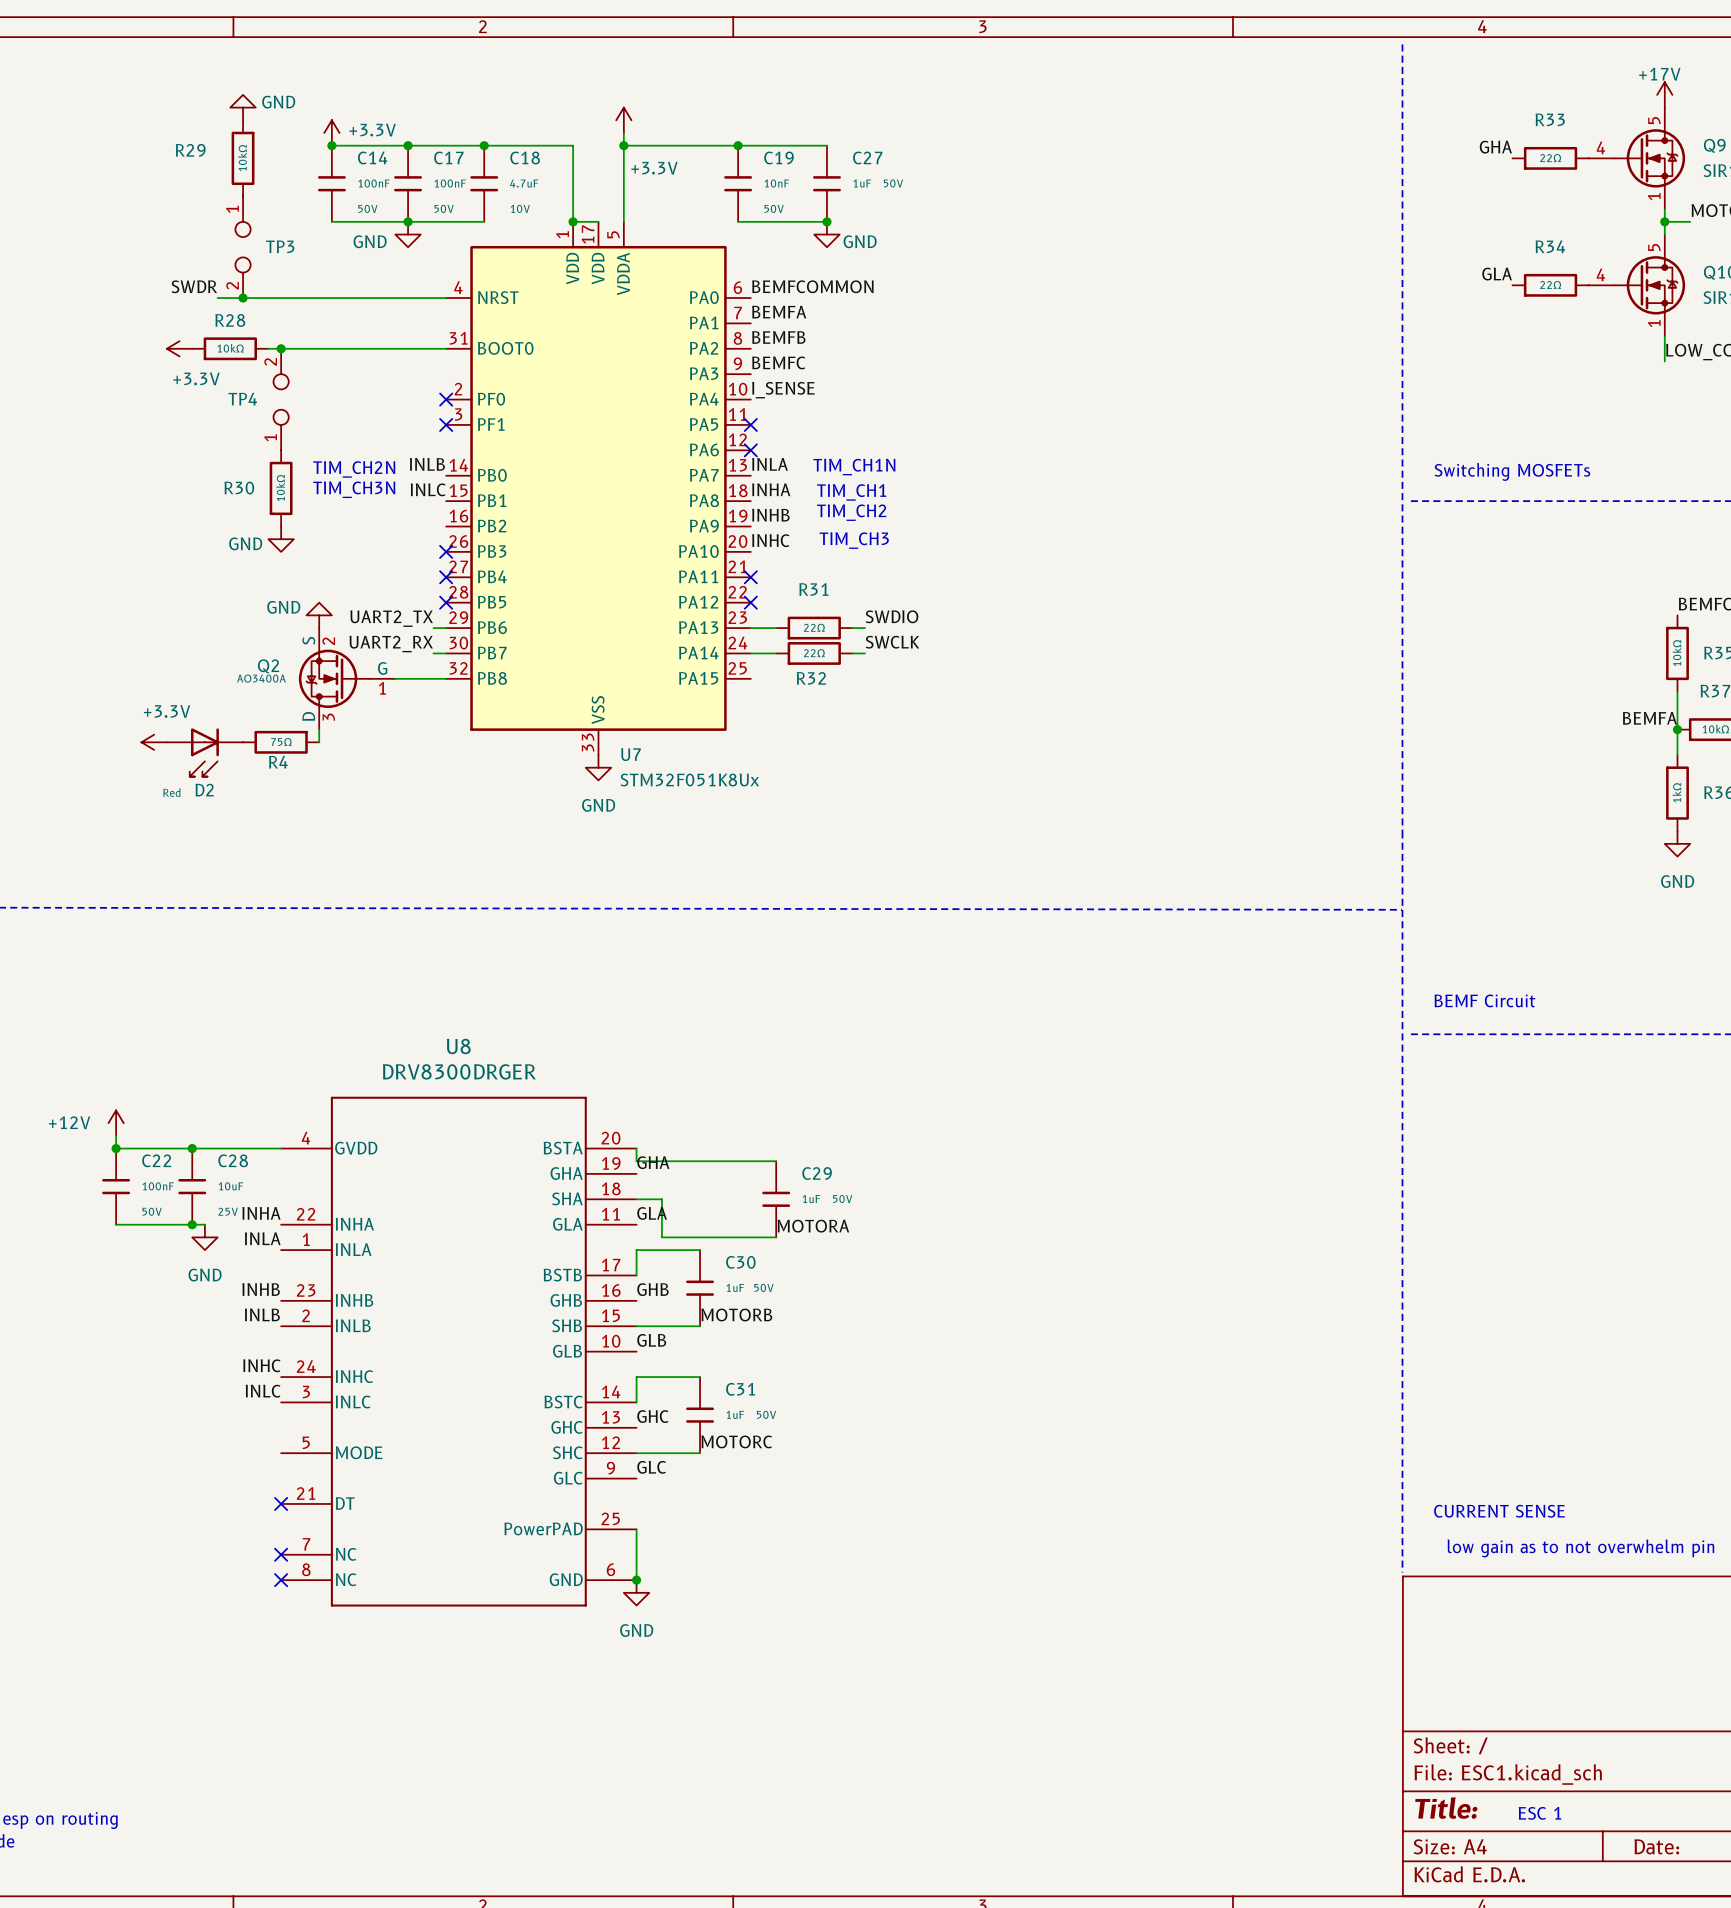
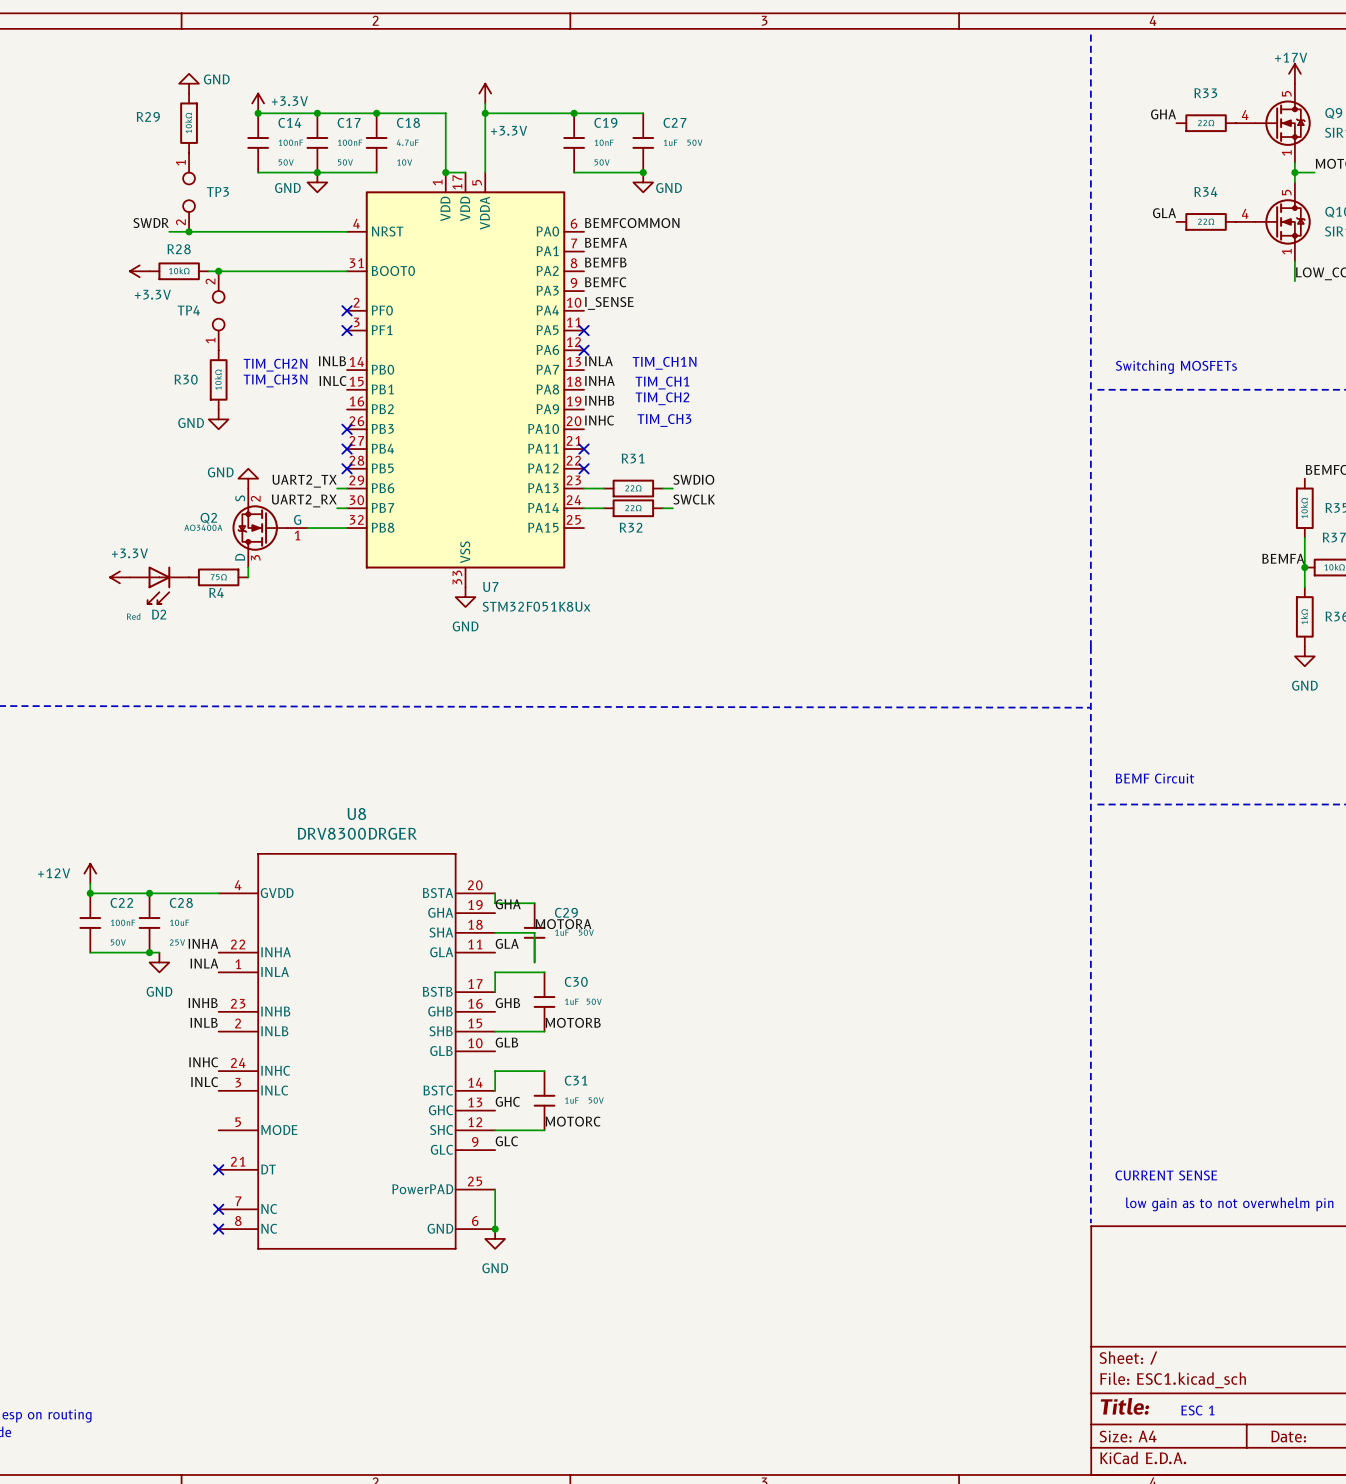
wire: (687, 1161) (776, 1161) -> none
wire: (661, 1199) (661, 1237) (776, 1237) -> (514, 932) (534, 932) (534, 962)
C29 position: (776, 1199) -> (534, 932)
label position: MOTORA (813, 1226) -> MOTORA (563, 924)

